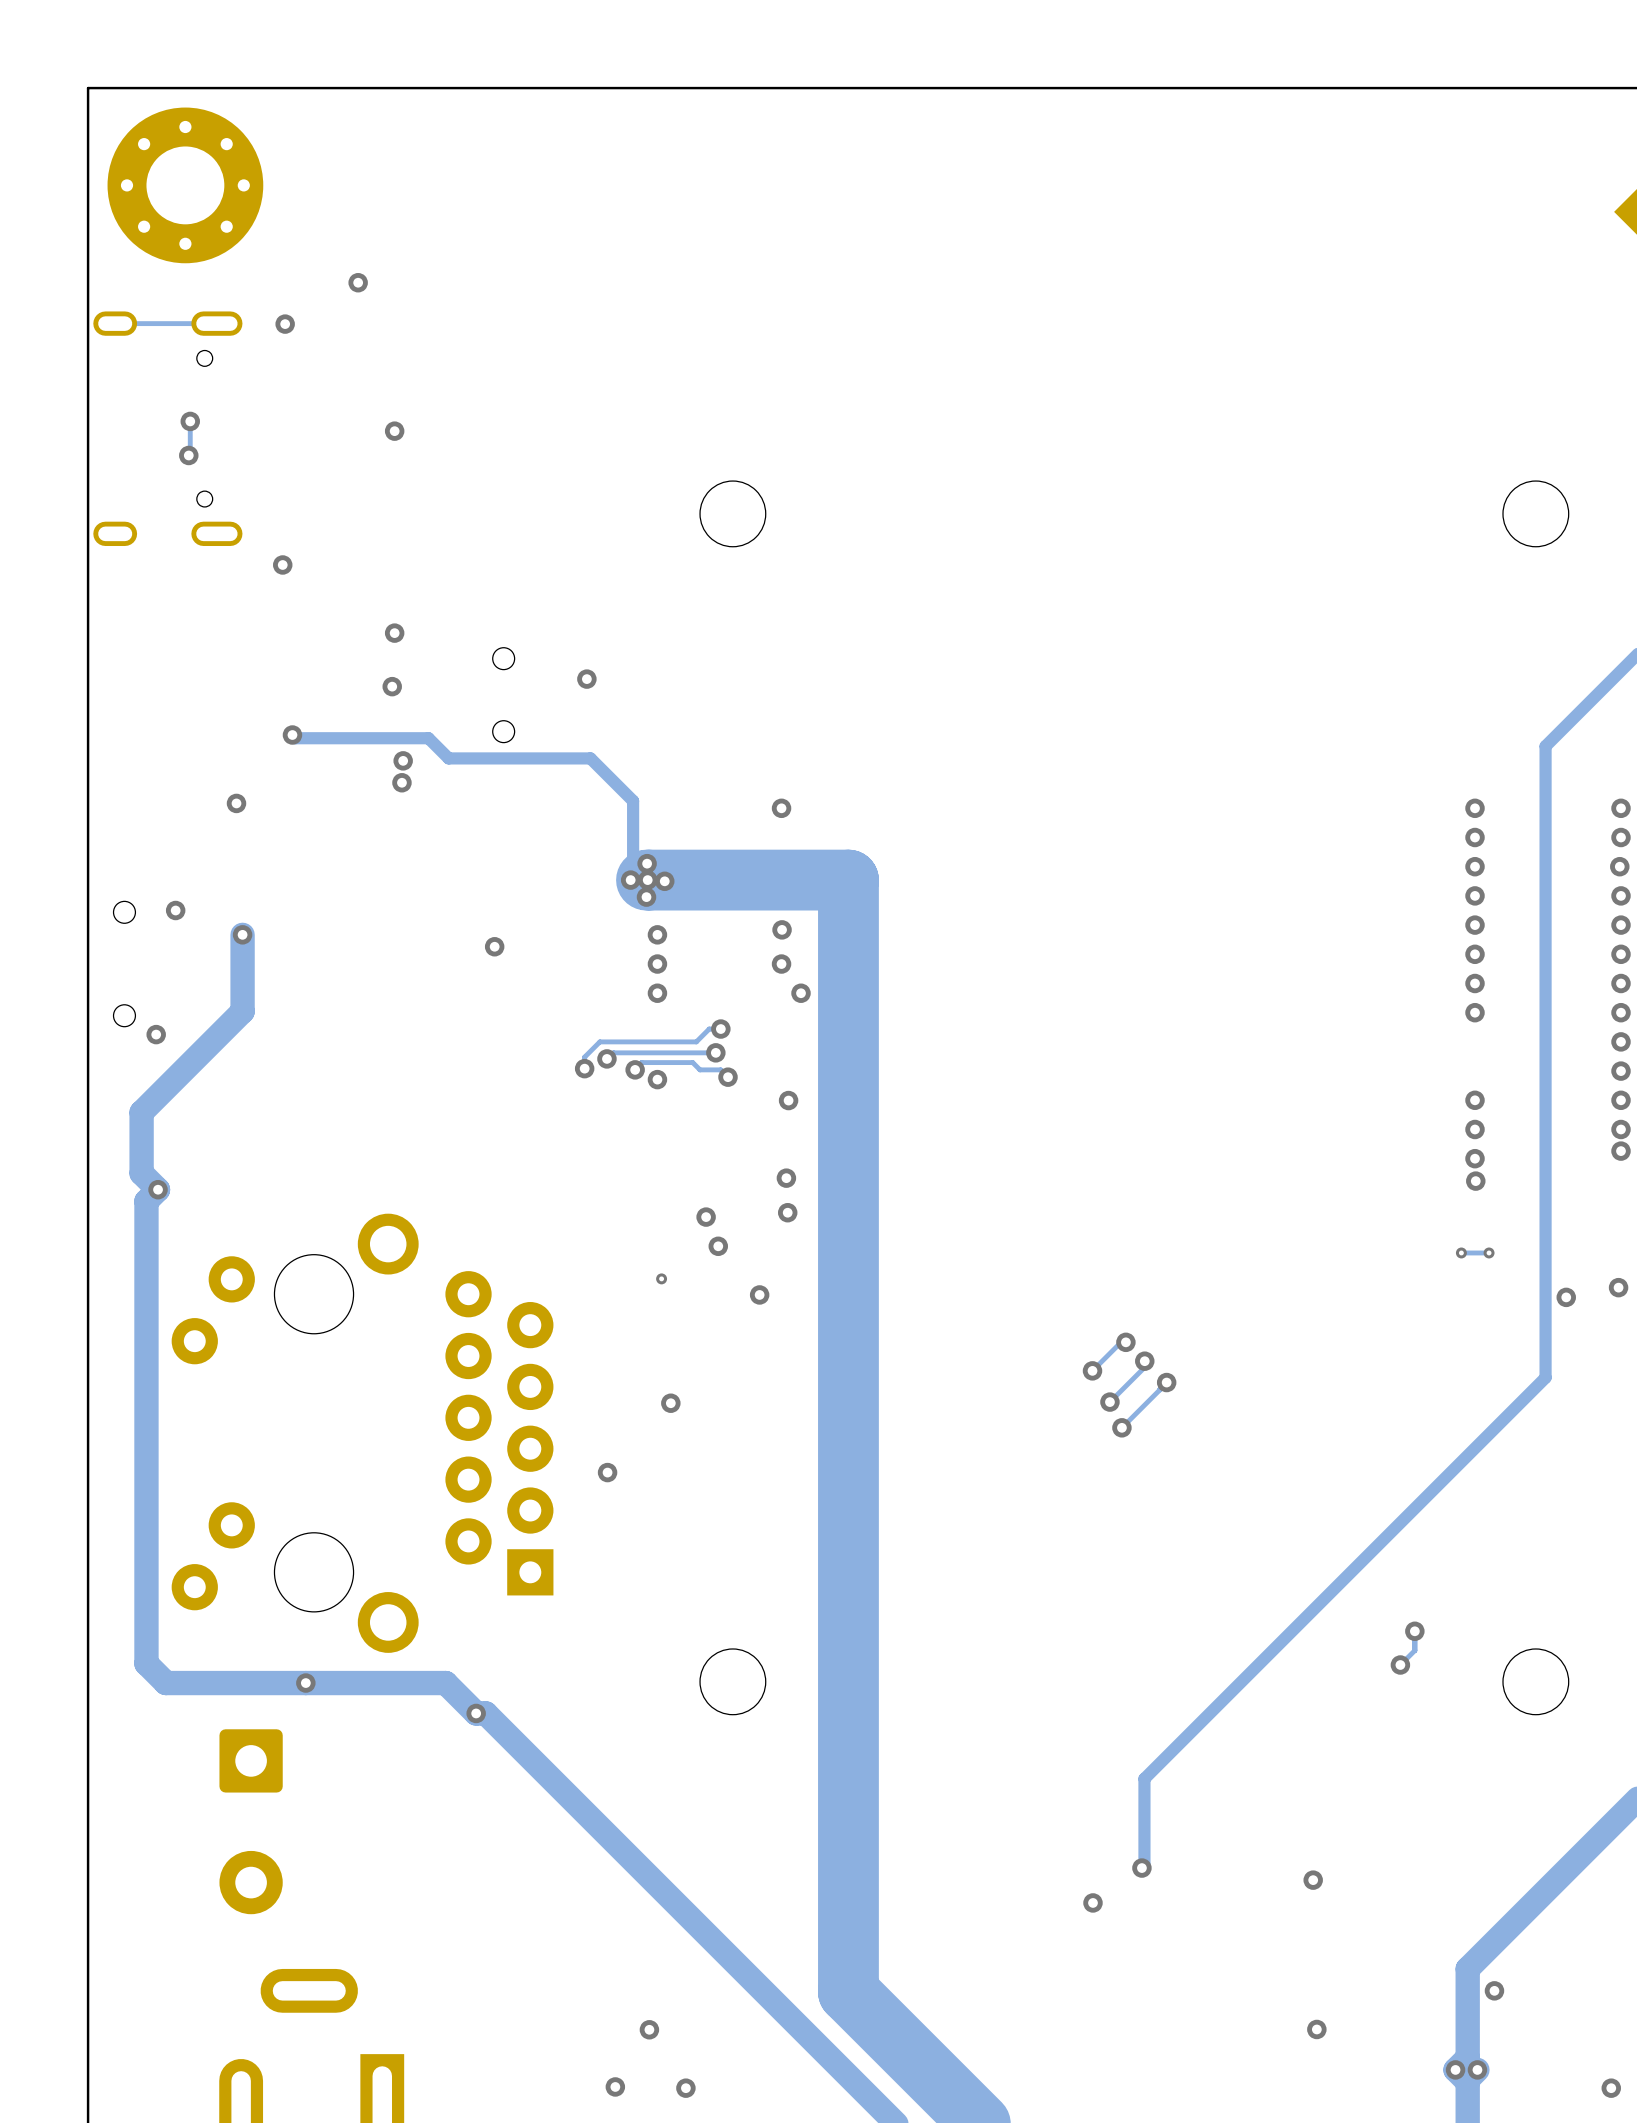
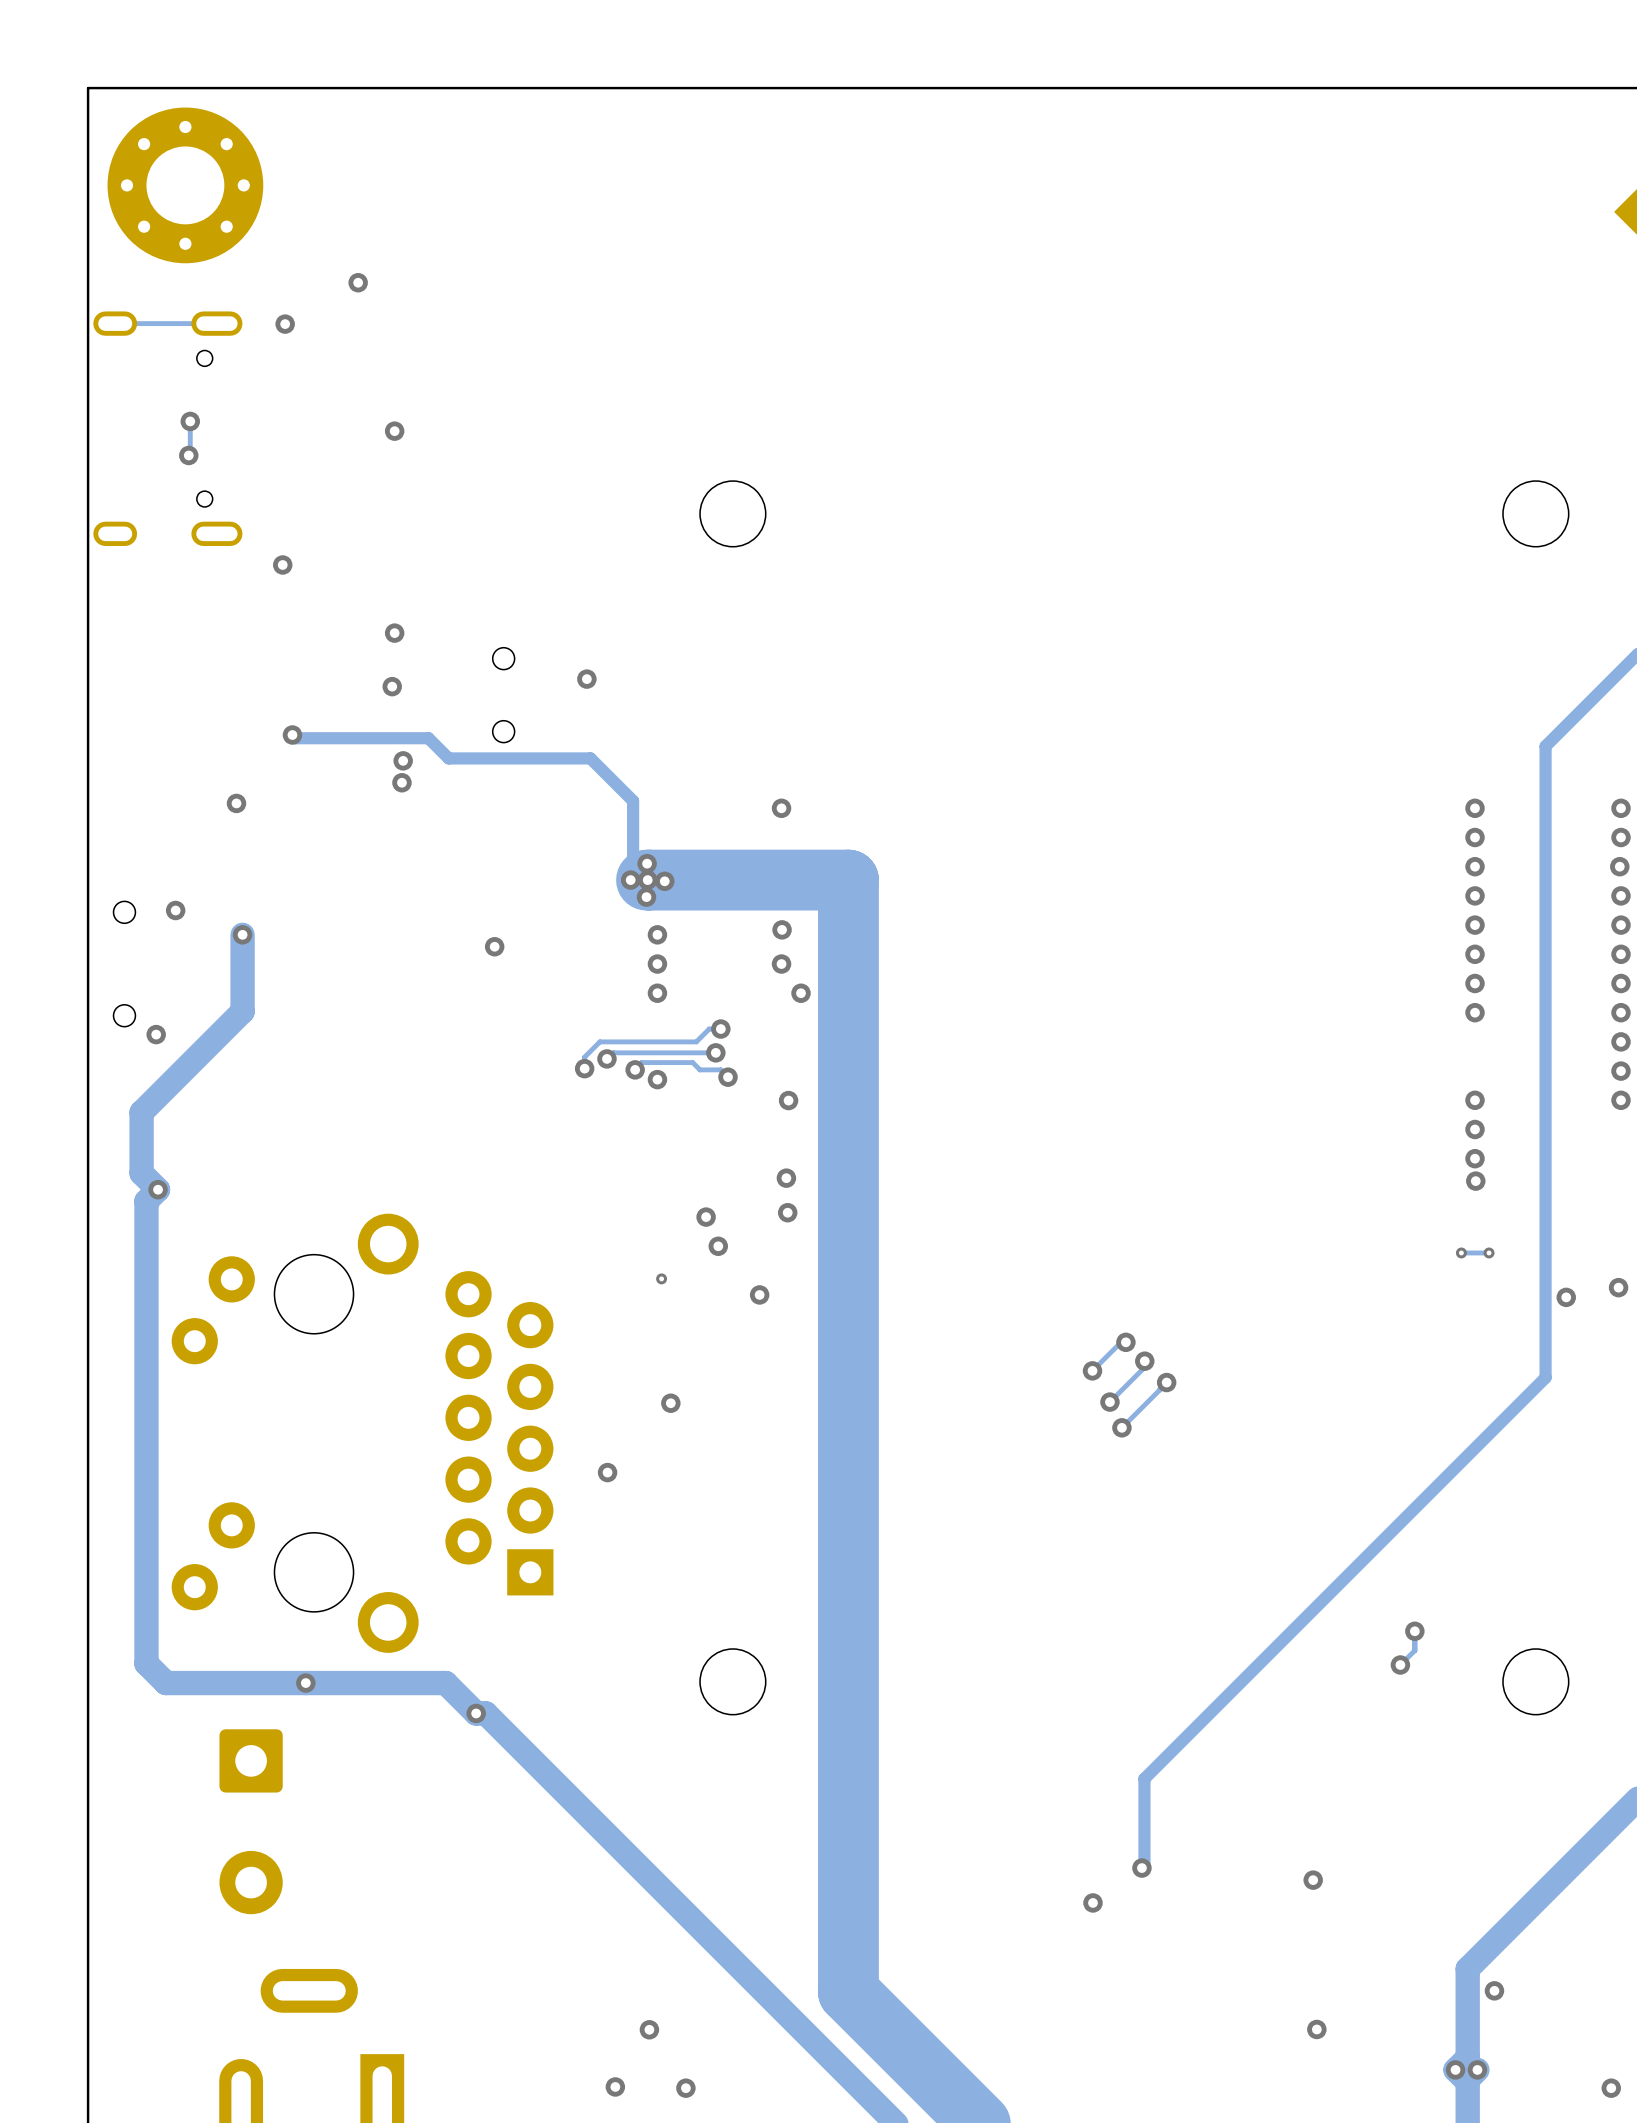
via: (1621, 1129) -> none
via: (1621, 1151) -> none

